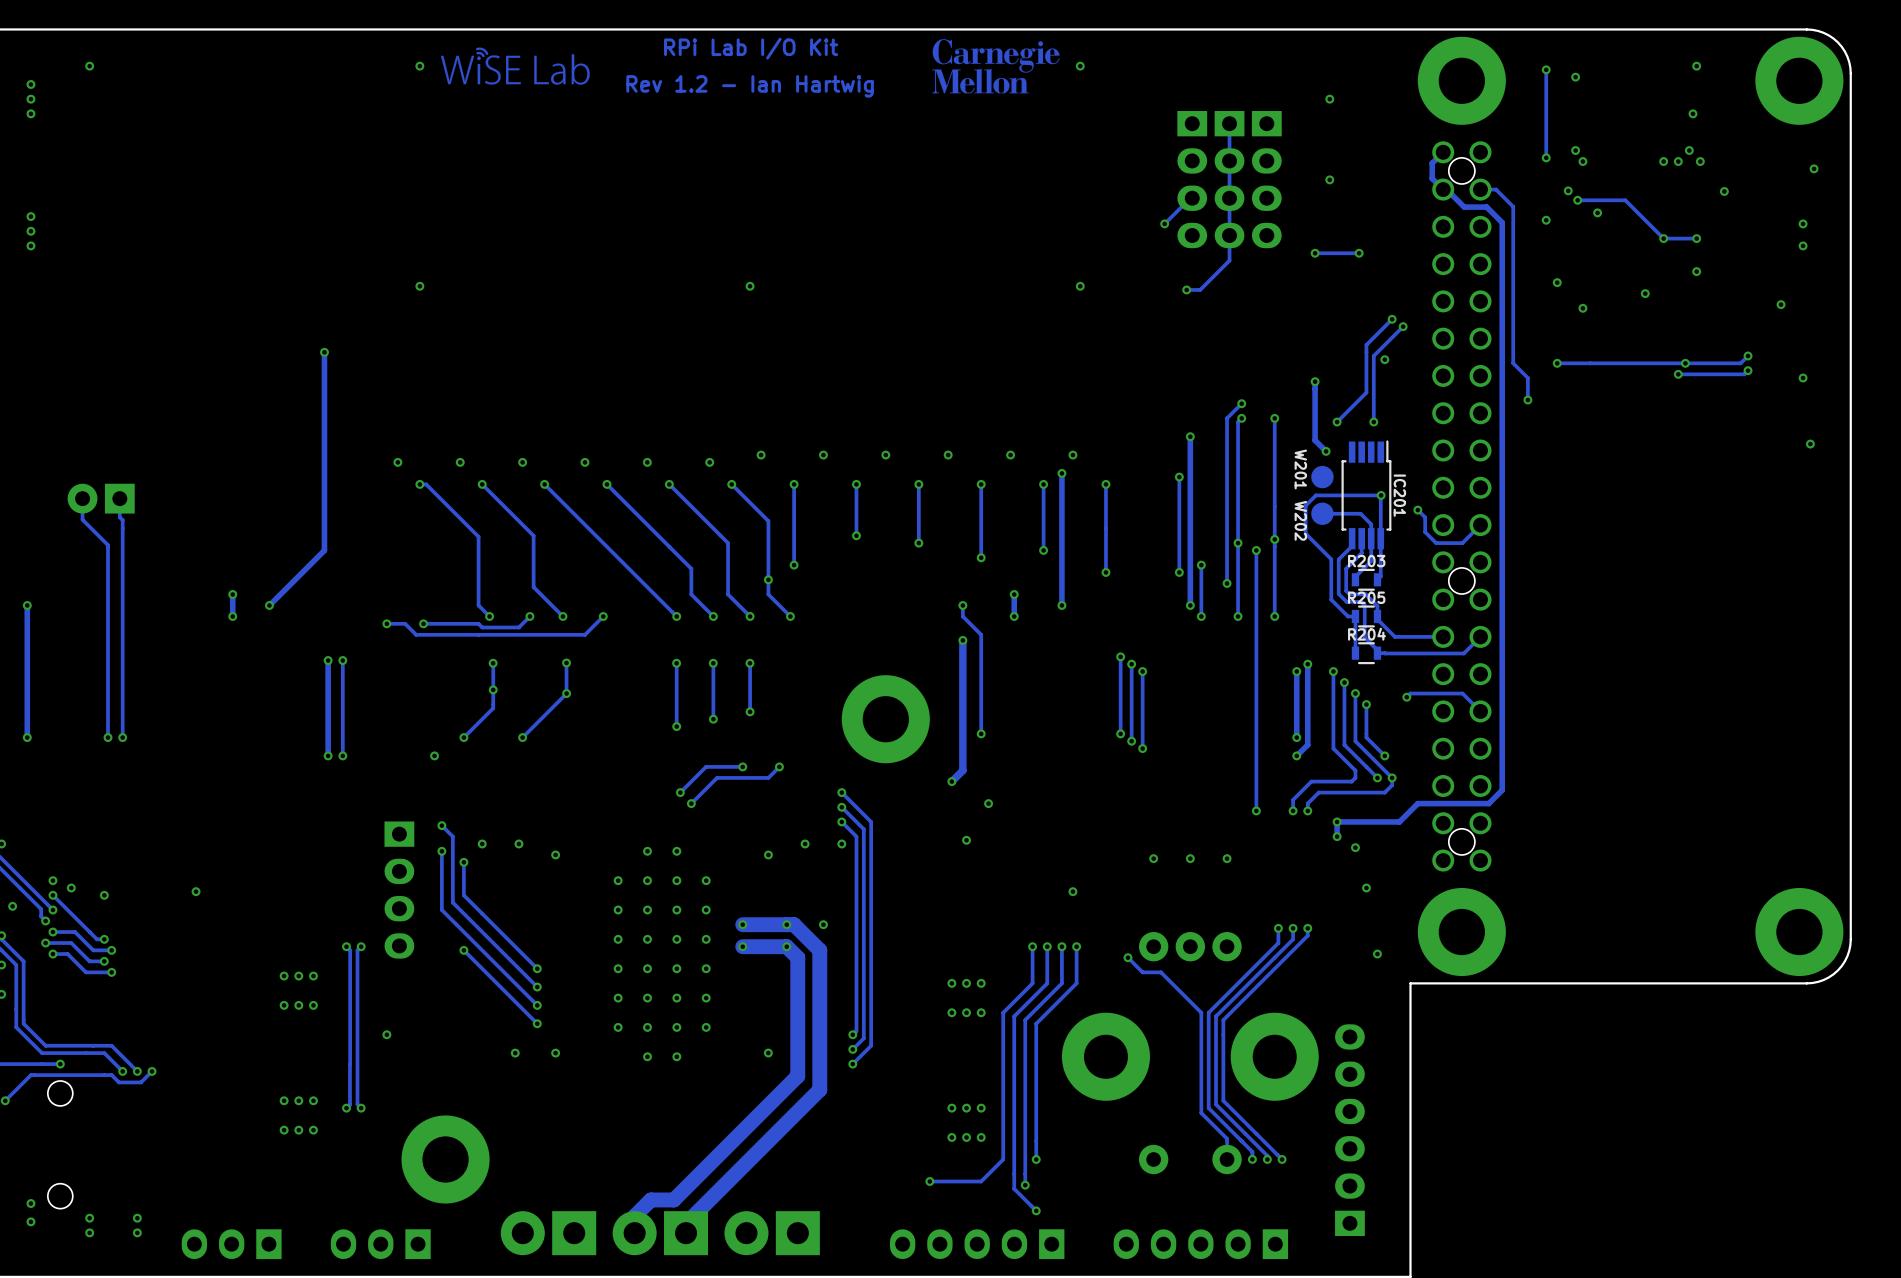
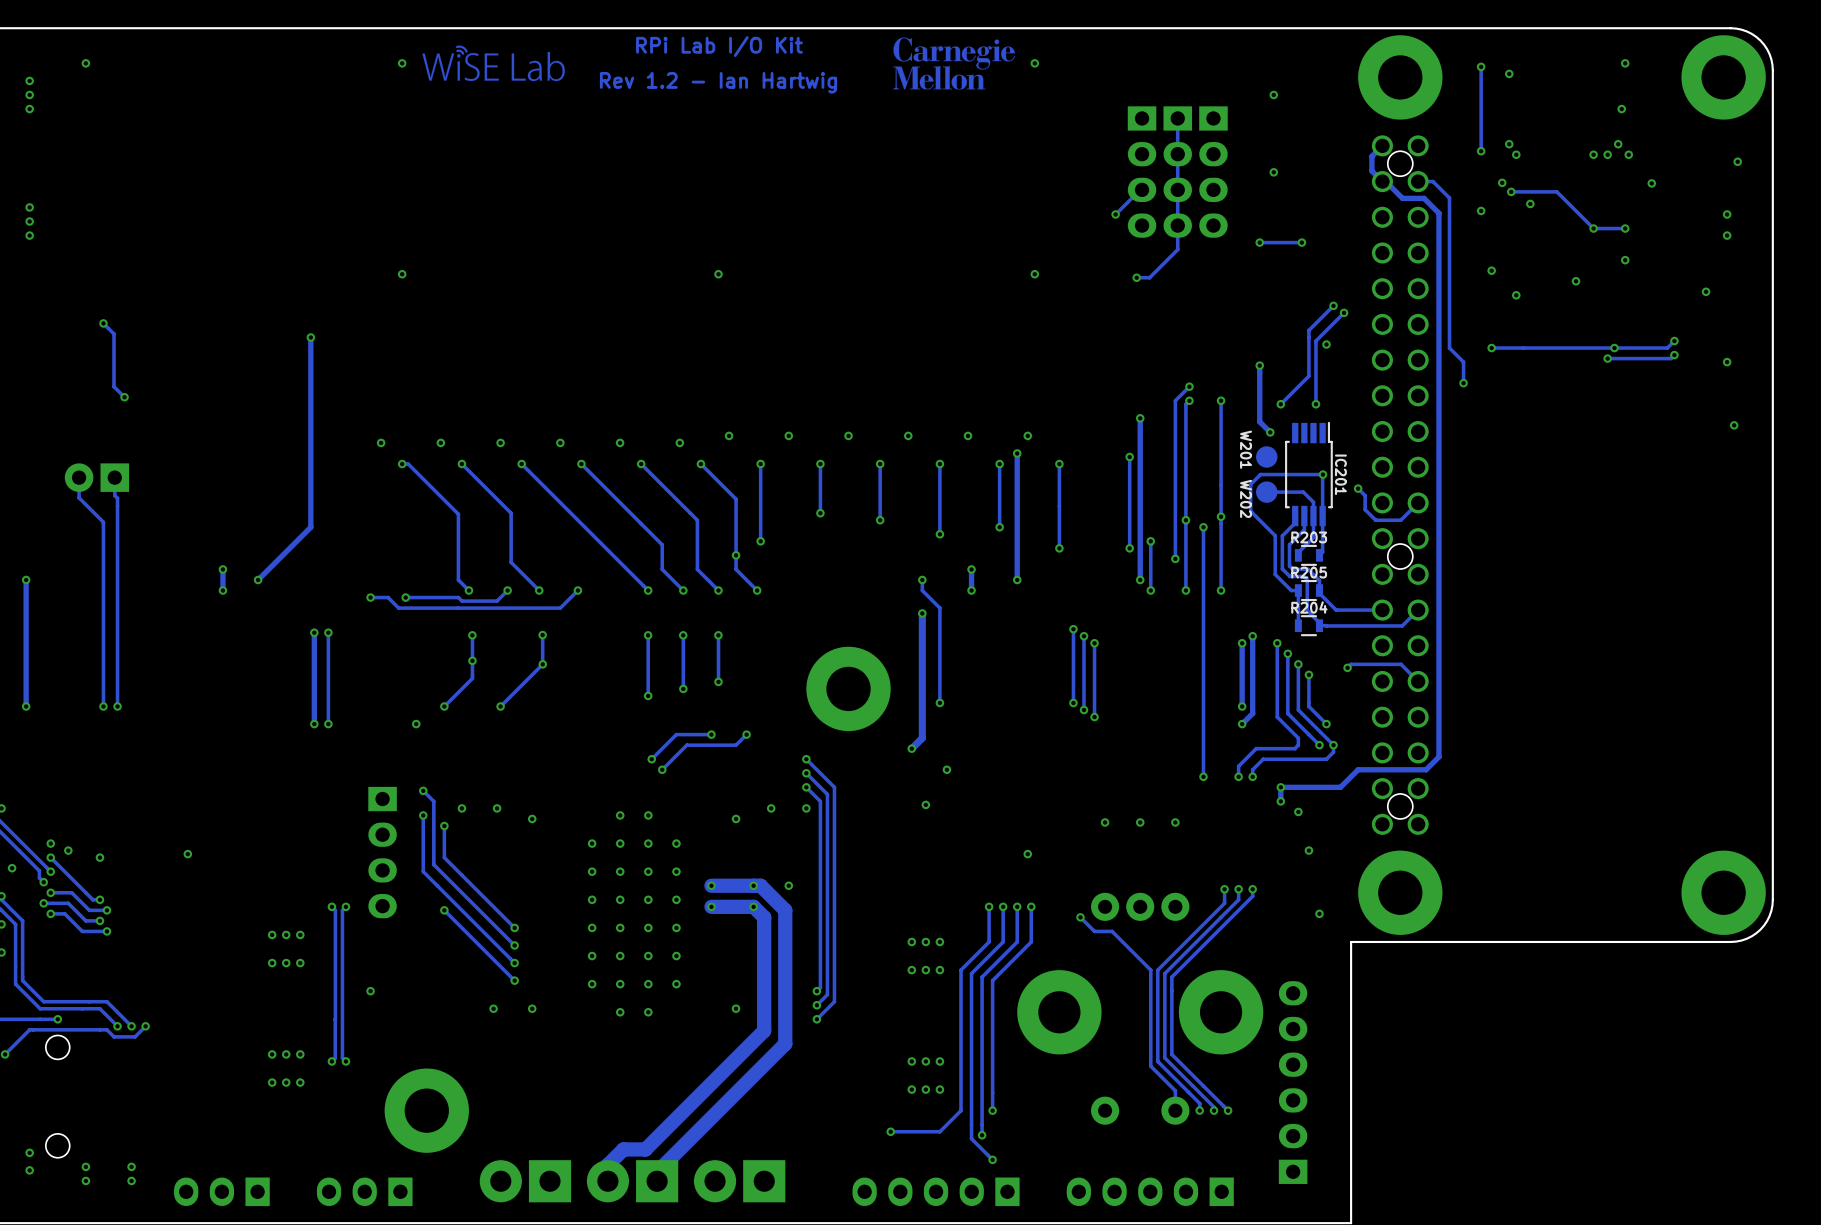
track: none -> (103, 323) (114, 333) (114, 386) (124, 397)
via: none -> (103, 323)
via: none -> (124, 397)

